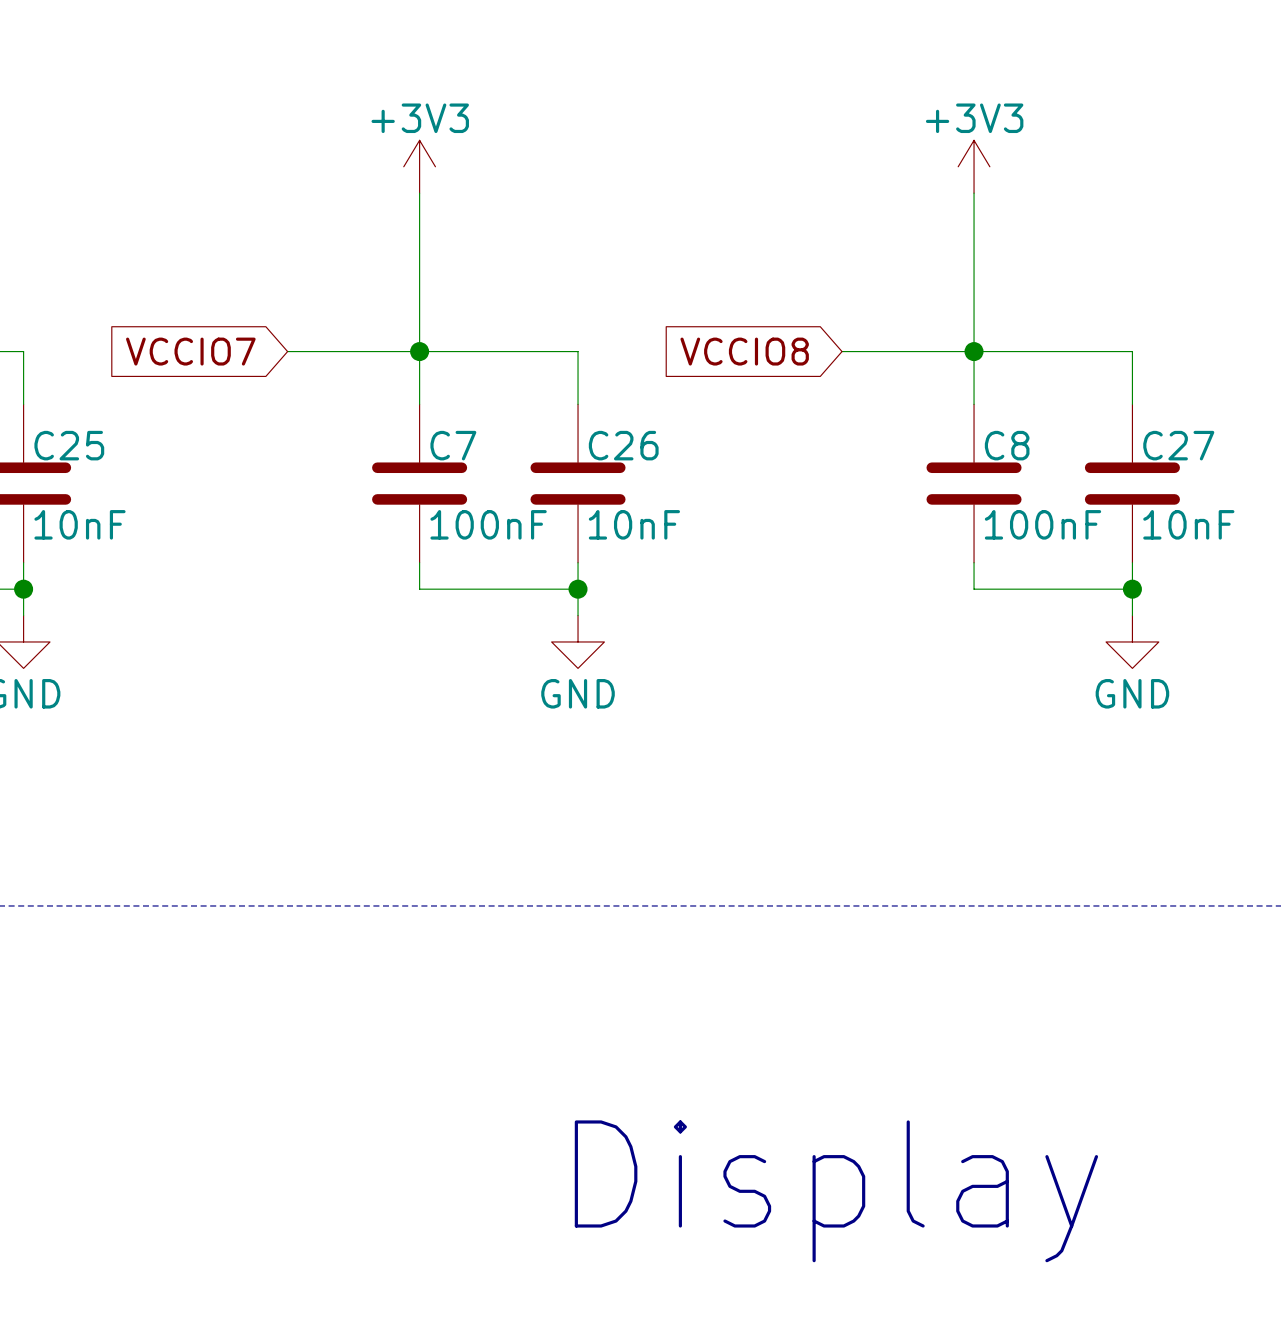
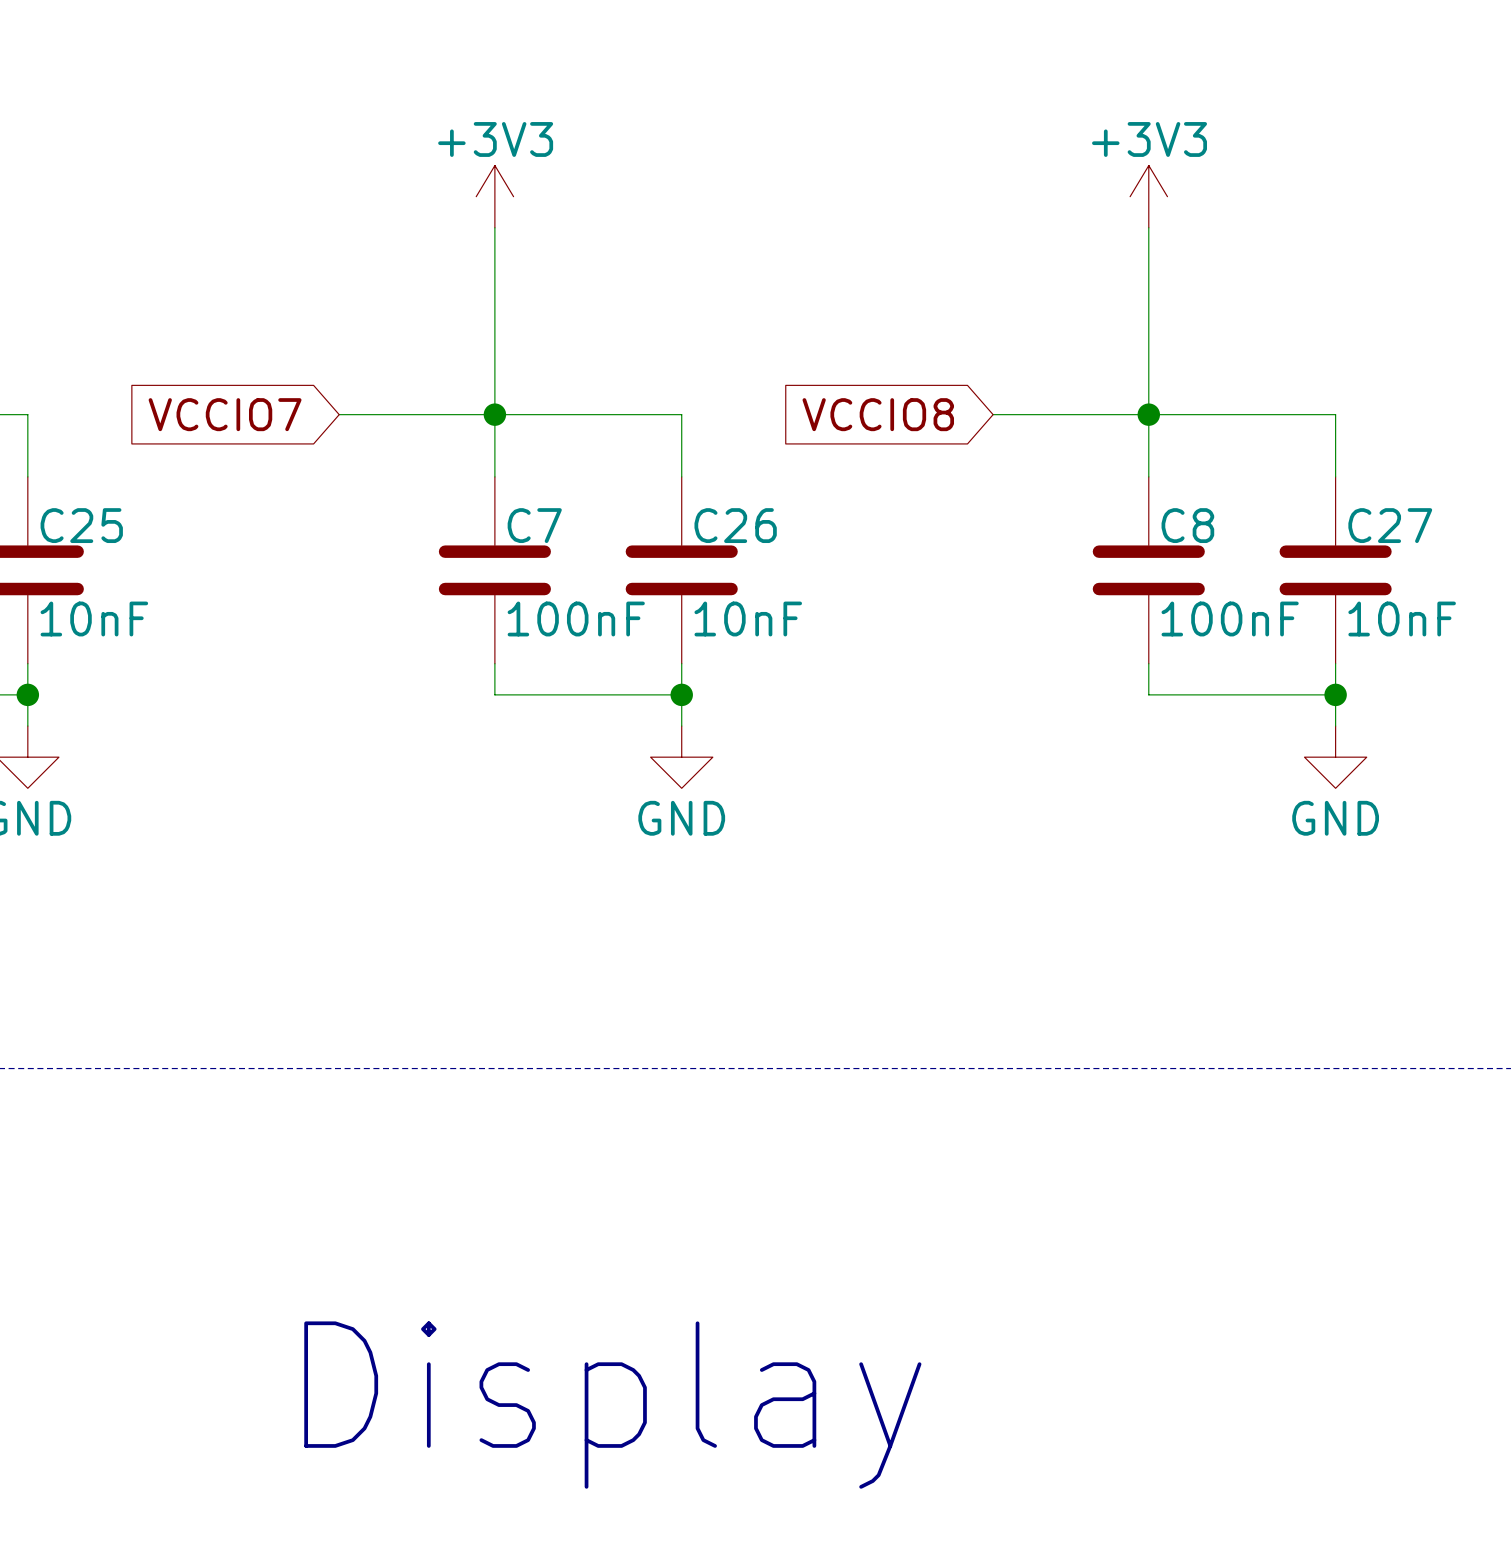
text position: Display (836, 1191) -> Display (612, 1405)

